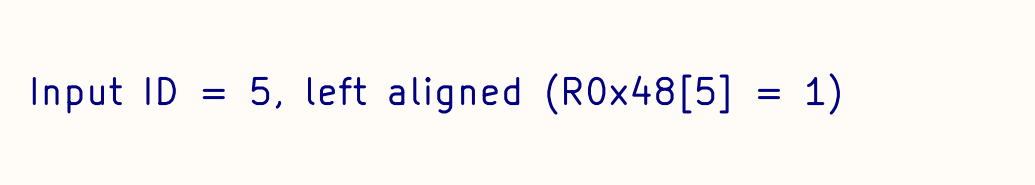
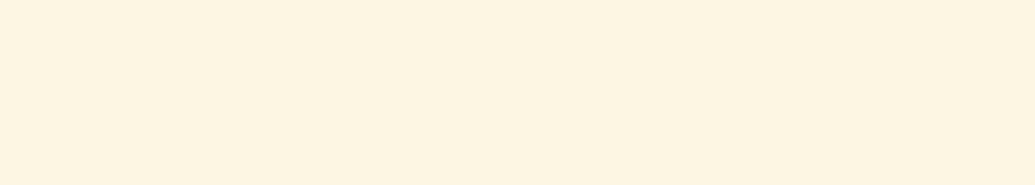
text: Input ID = 5, left aligned (R0x48[5] = 1) (436, 93) -> none

